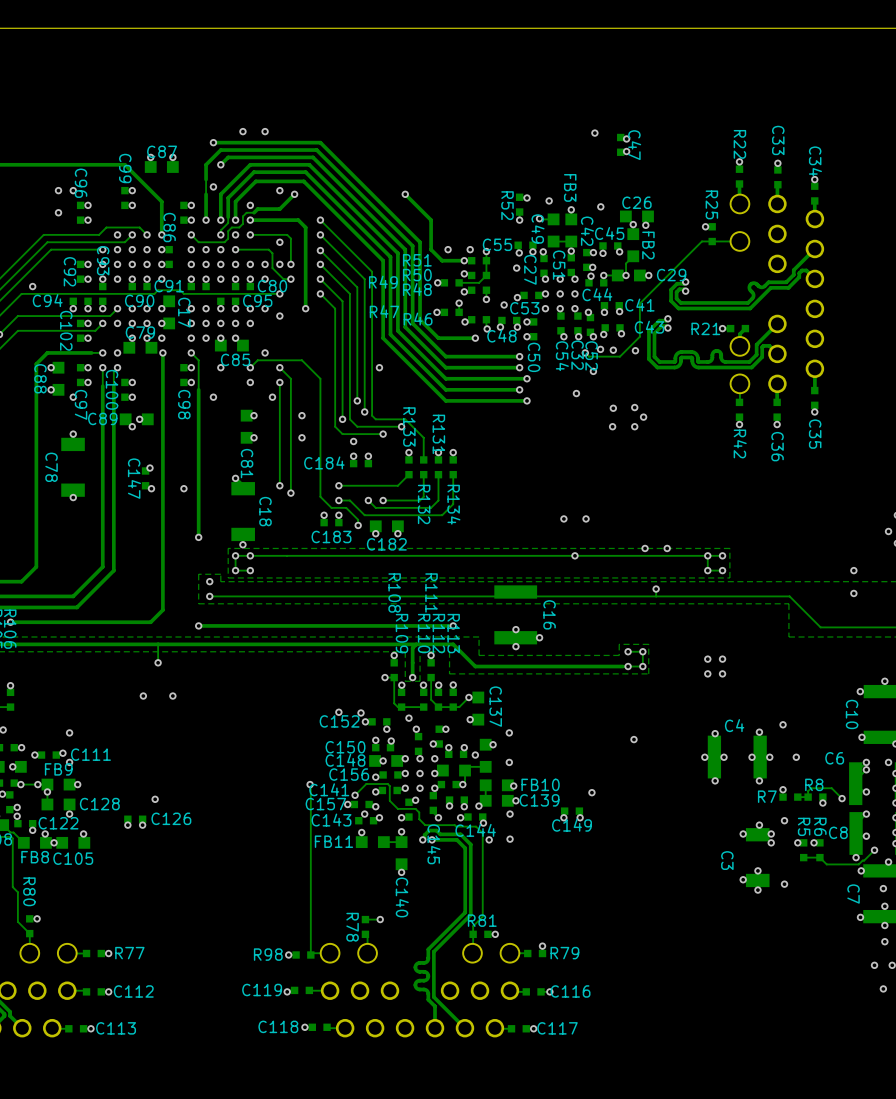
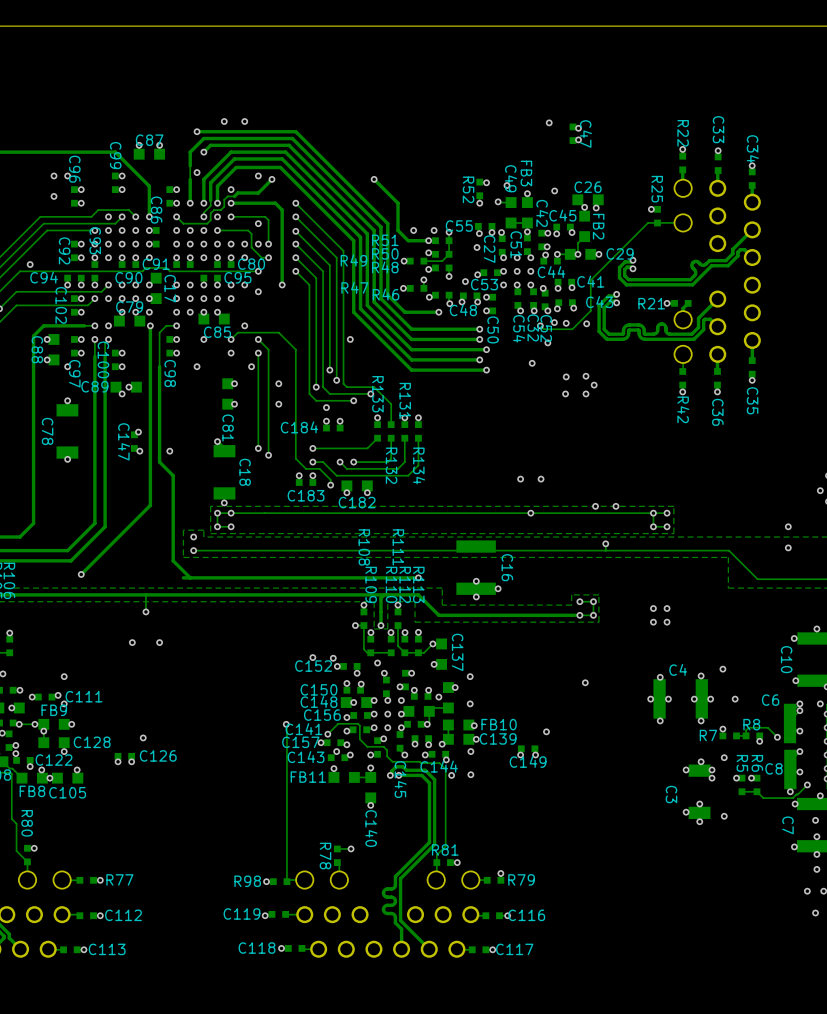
C49 name position: C49 (538, 228) -> C49 (511, 178)
track: (191, 352) (198, 360) (198, 537) -> (176, 325) (166, 325) (159, 332) (159, 462) (173, 475) (173, 560) (190, 577)
via: (198, 537) -> none
track: (162, 547) (162, 610) (150, 622) (10, 622) -> (150, 505) (81, 574)
via: (10, 622) -> none
via: none -> (81, 574)
via: (198, 625) -> none

